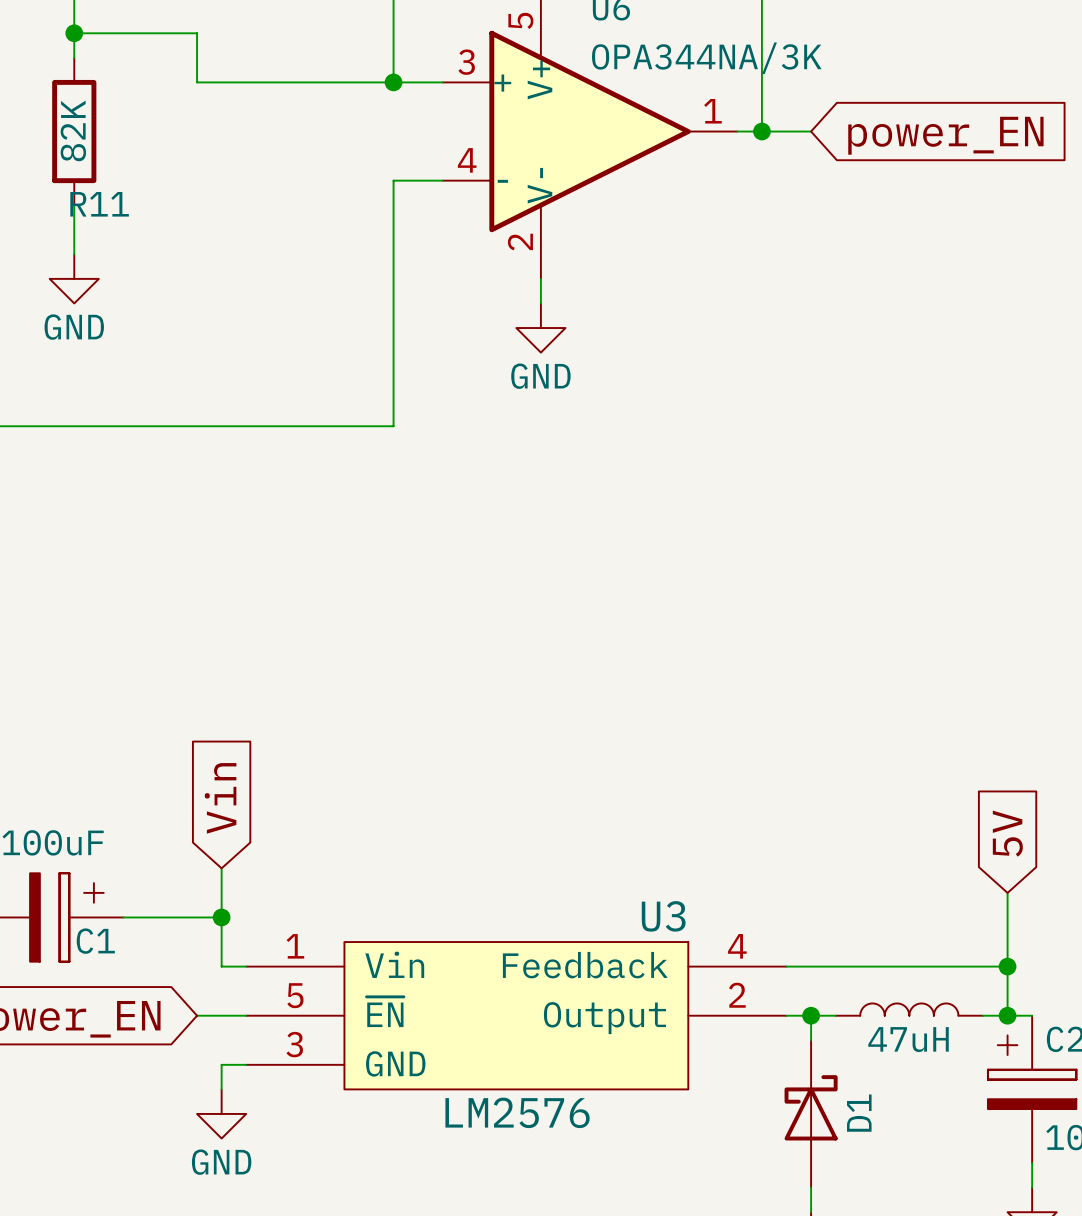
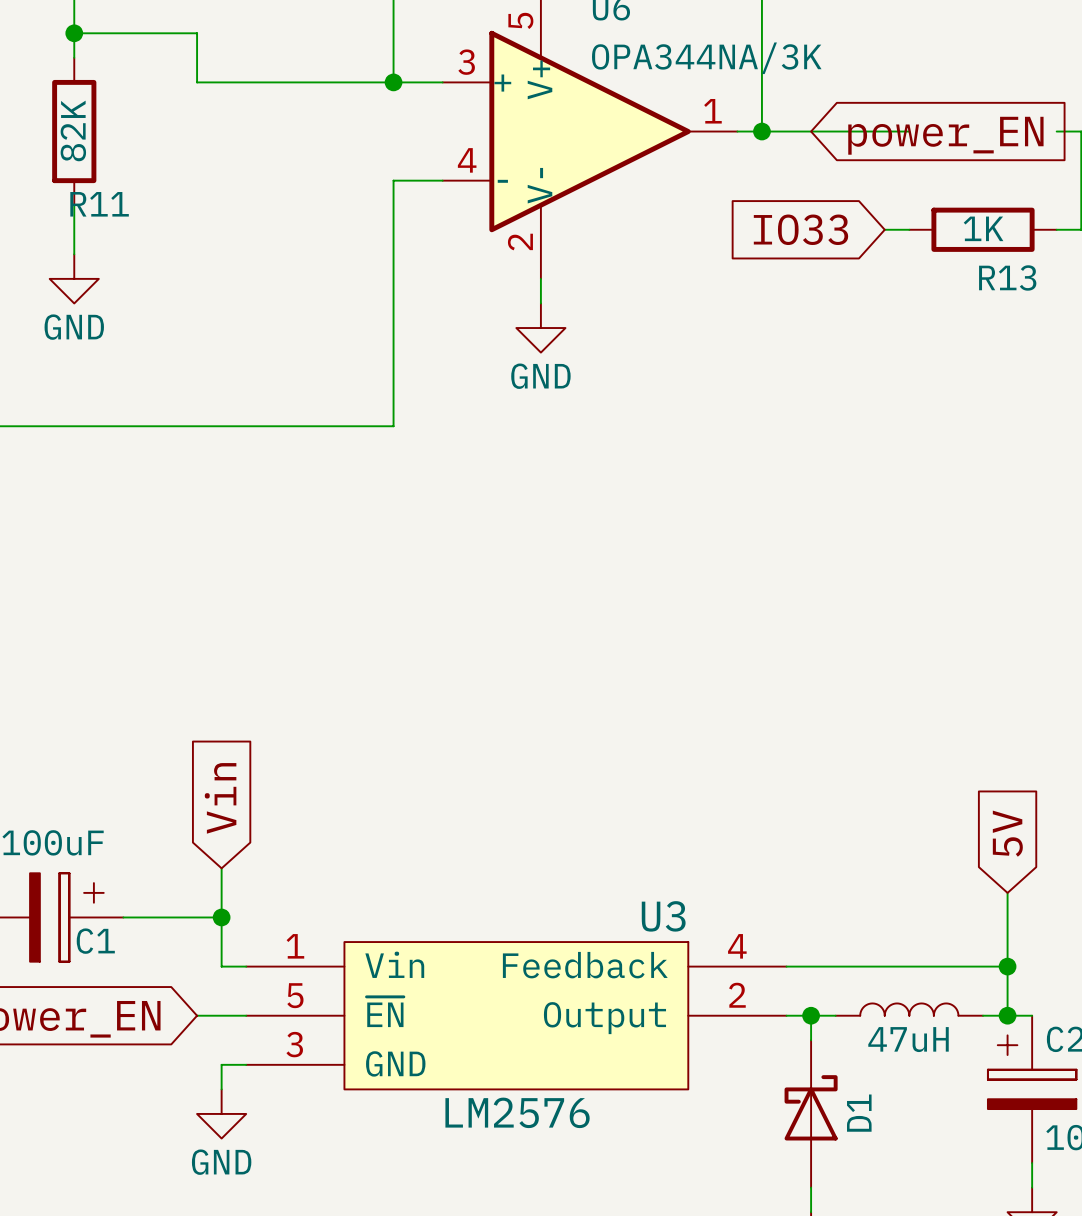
wire: none -> (811, 131) (909, 131)
wire: none -> (1056, 131) (1081, 131) (1081, 229) (1056, 229)
global label: none -> IO33 (800, 229)
wire: none -> (884, 229) (909, 229)
R13: none -> 1K (983, 229)

